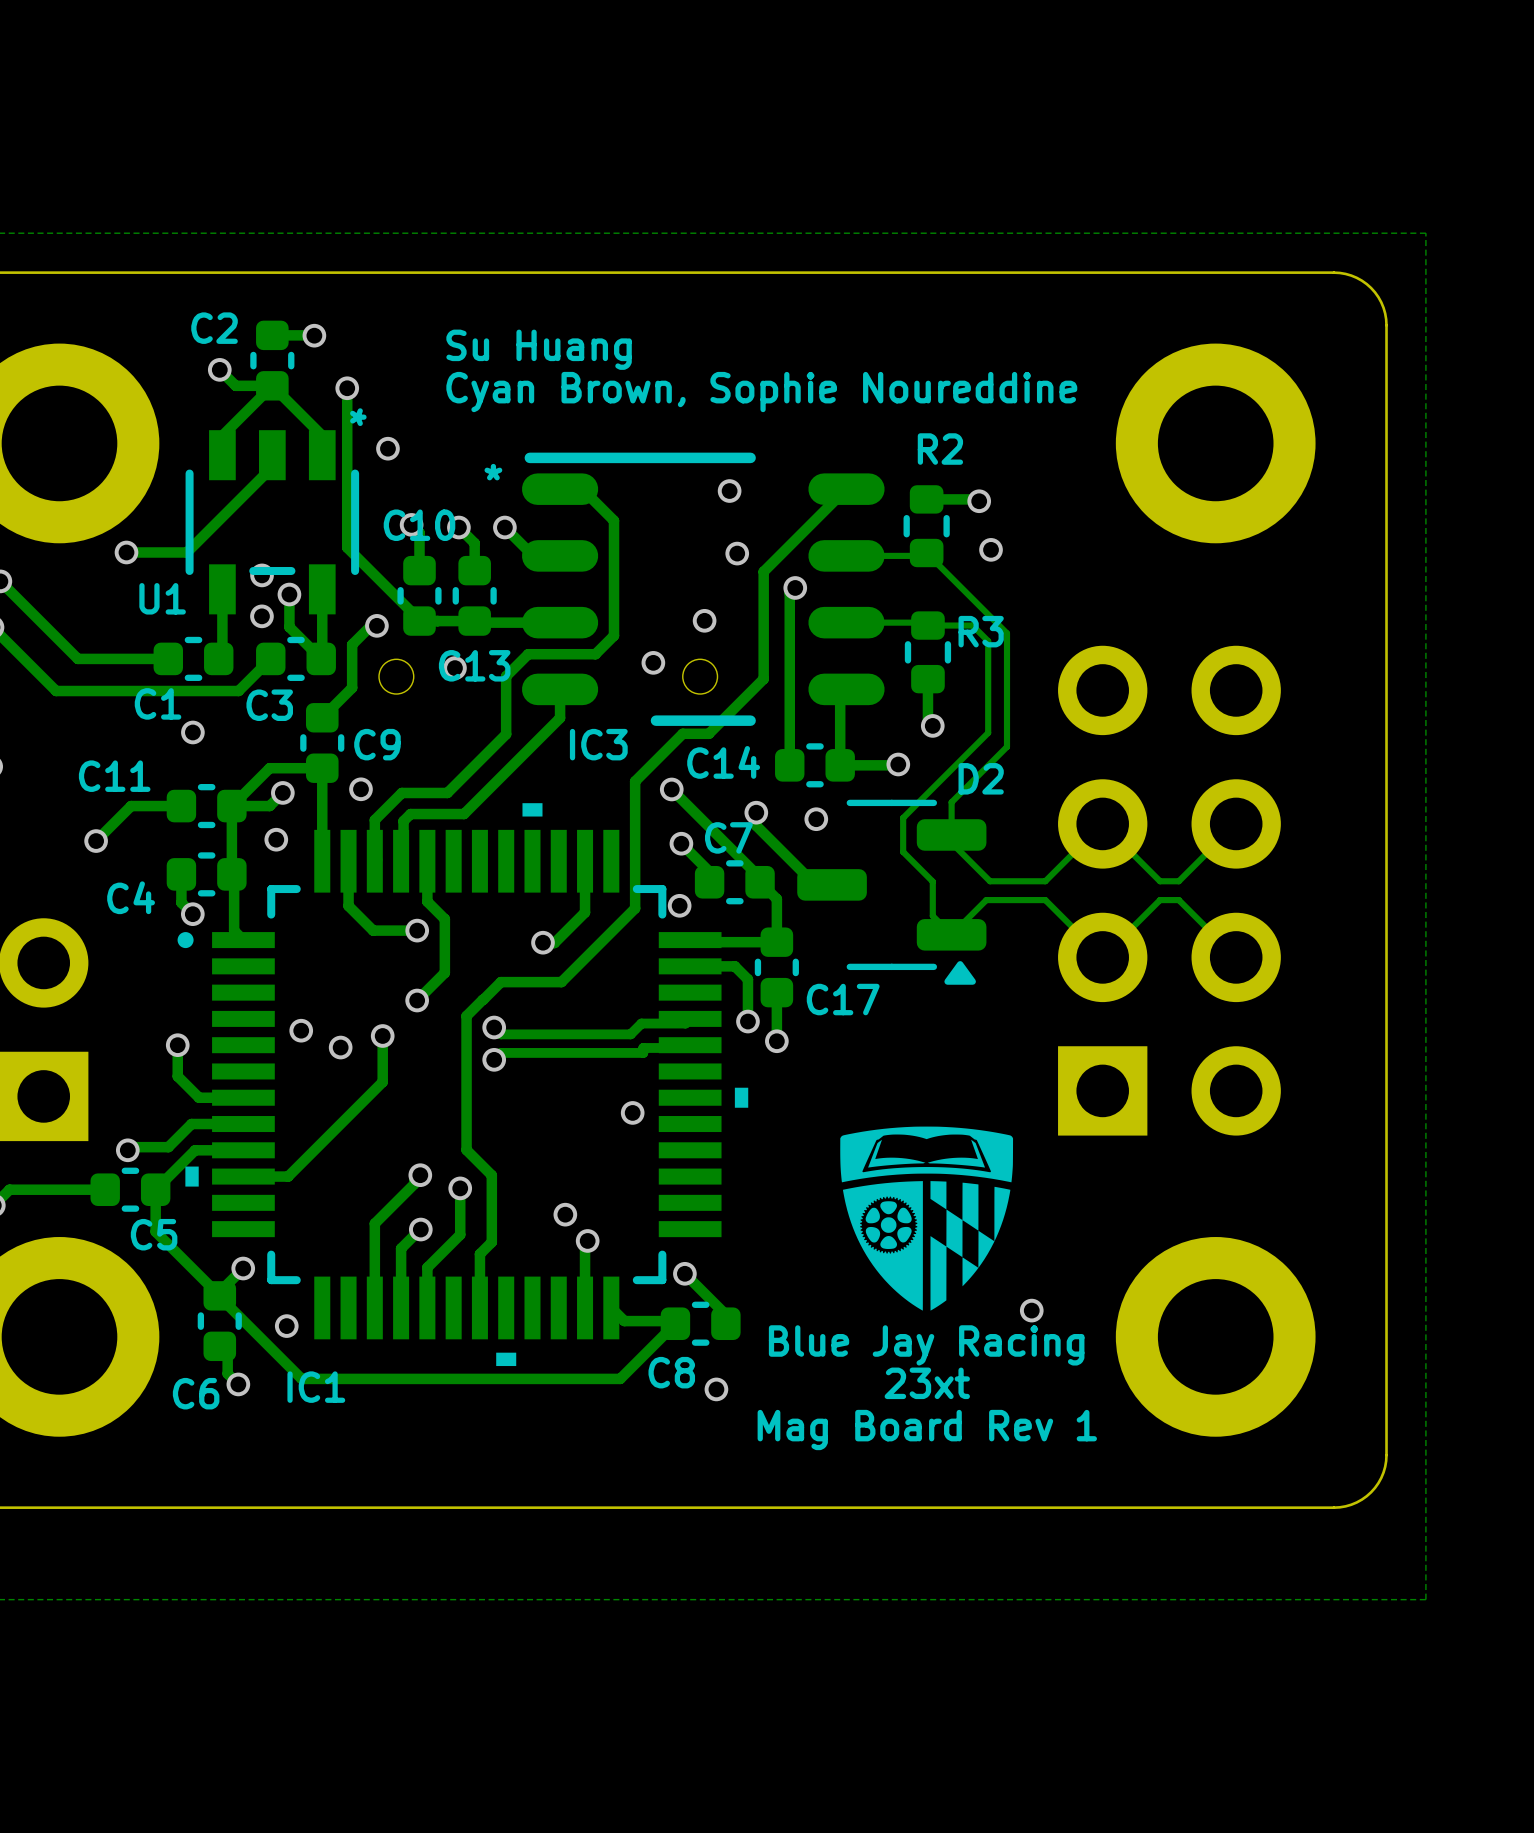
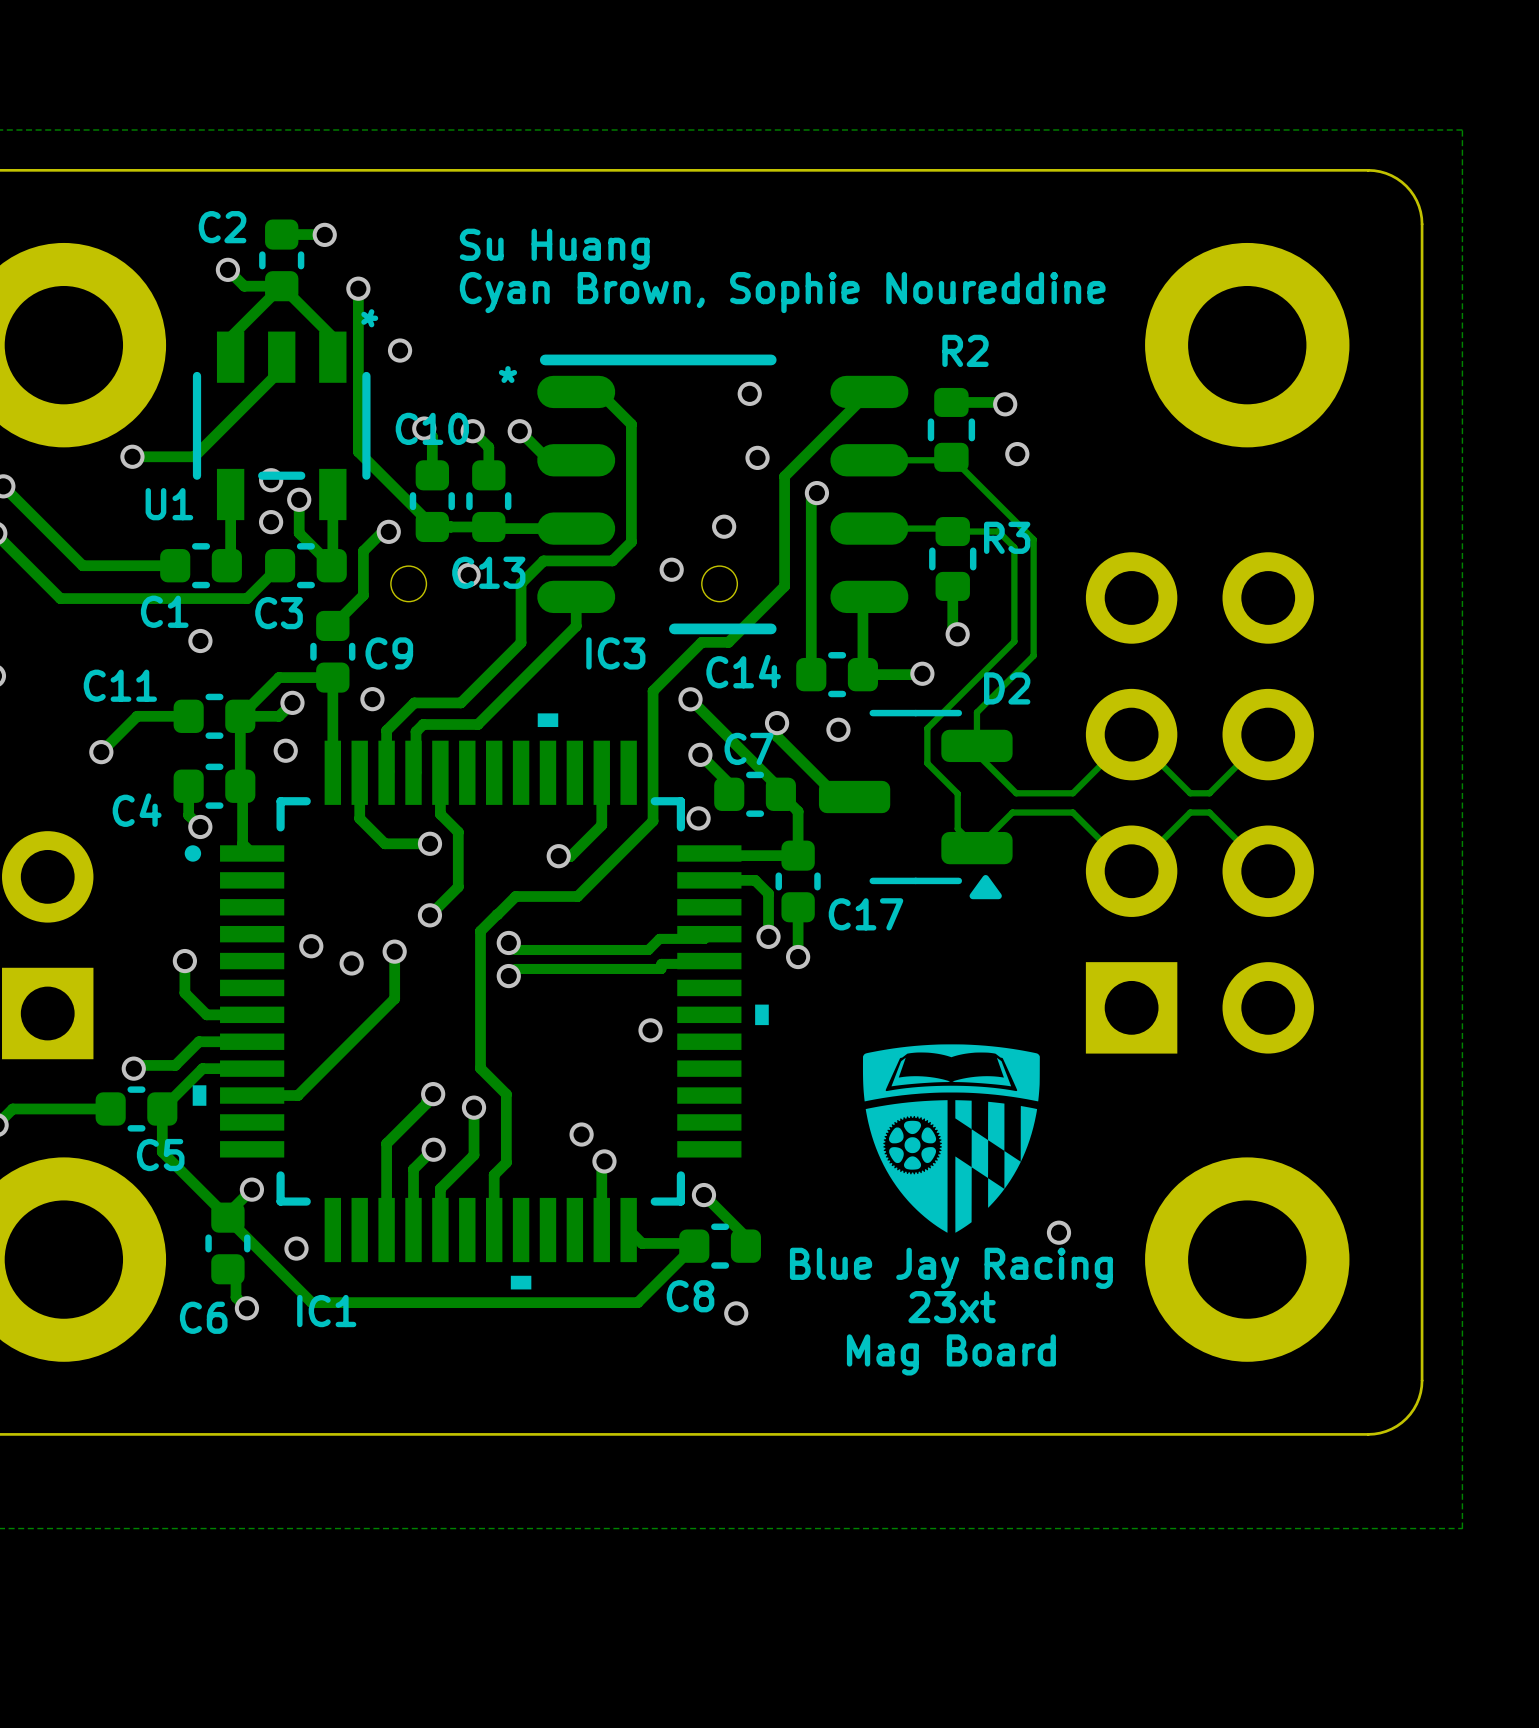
text: Mag Board Rev 1 (927, 1430) -> Mag Board (951, 1354)

